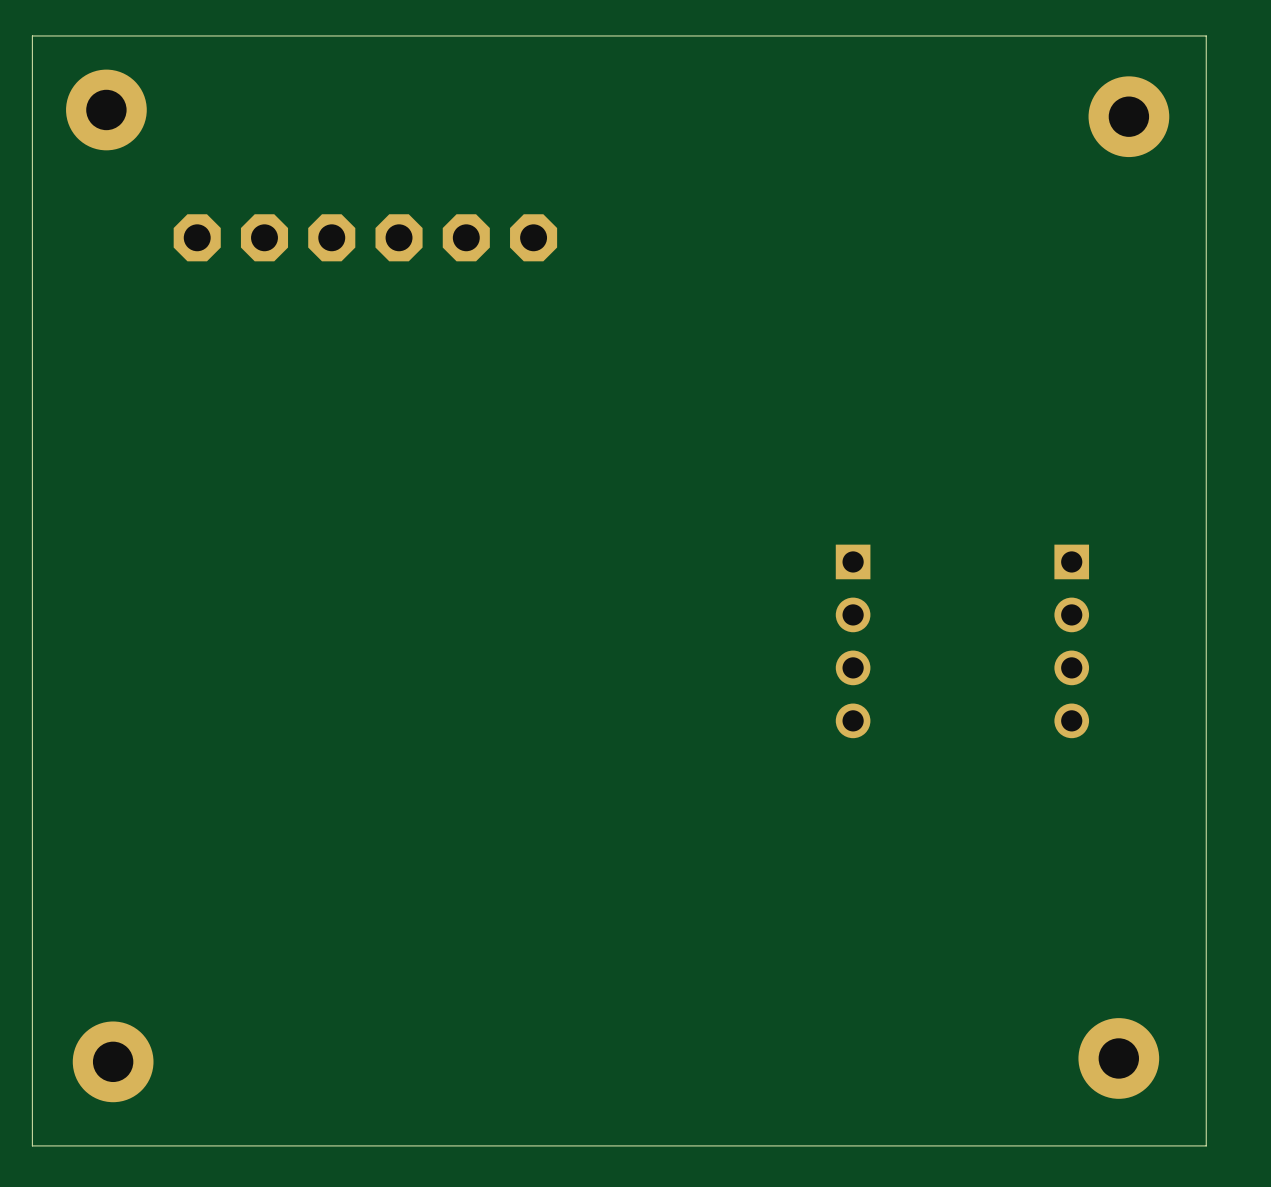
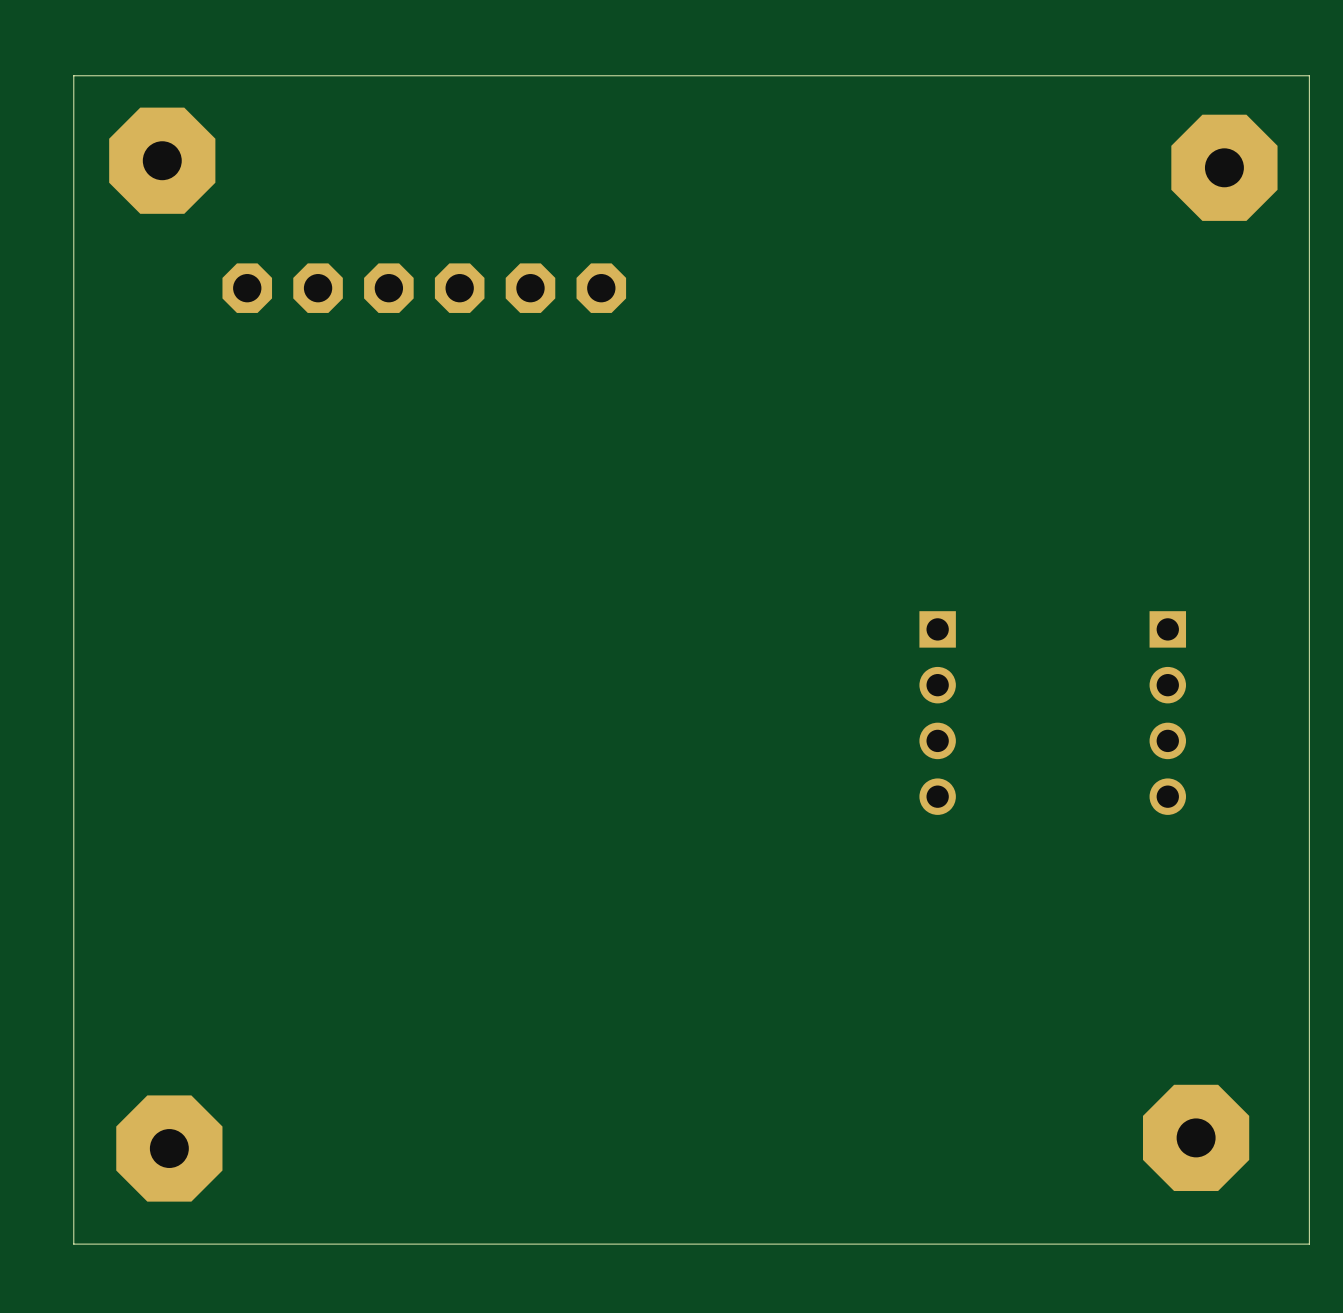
part footprint: [66, 69, 147, 151] -> [109, 107, 216, 214]
part footprint: [1088, 76, 1170, 158] -> [1171, 114, 1278, 221]
part footprint: [1078, 1018, 1160, 1099] -> [1143, 1084, 1250, 1192]
part footprint: [72, 1021, 154, 1103] -> [116, 1095, 223, 1202]

